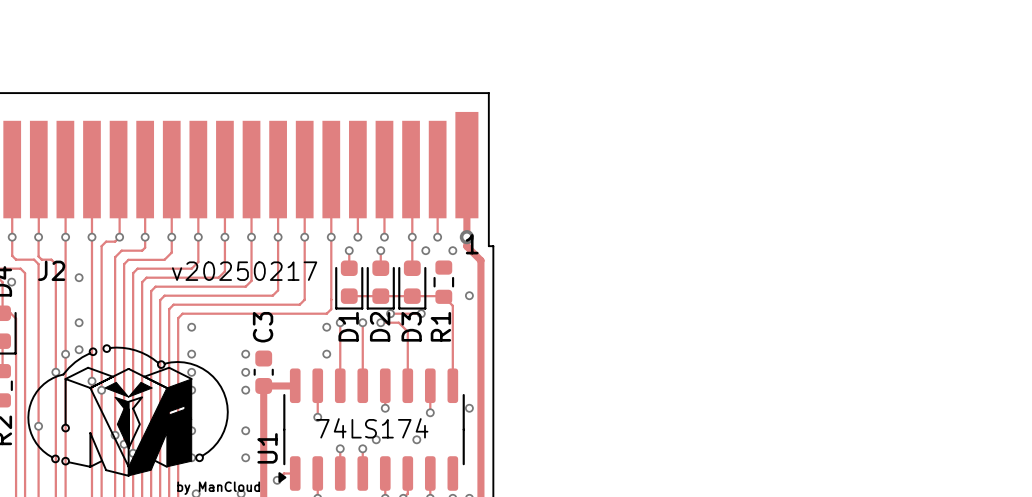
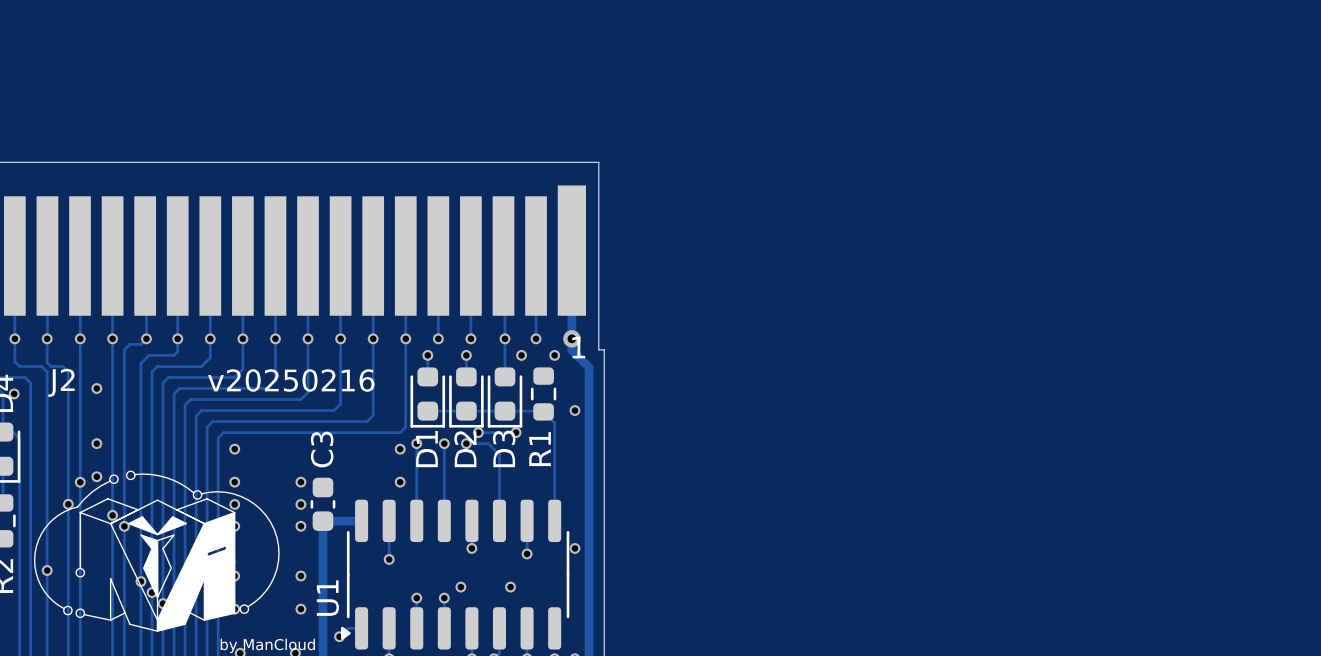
text: v20250217 (244, 271) -> v20250216 (291, 380)
text: 74LS174 (372, 428) -> none

